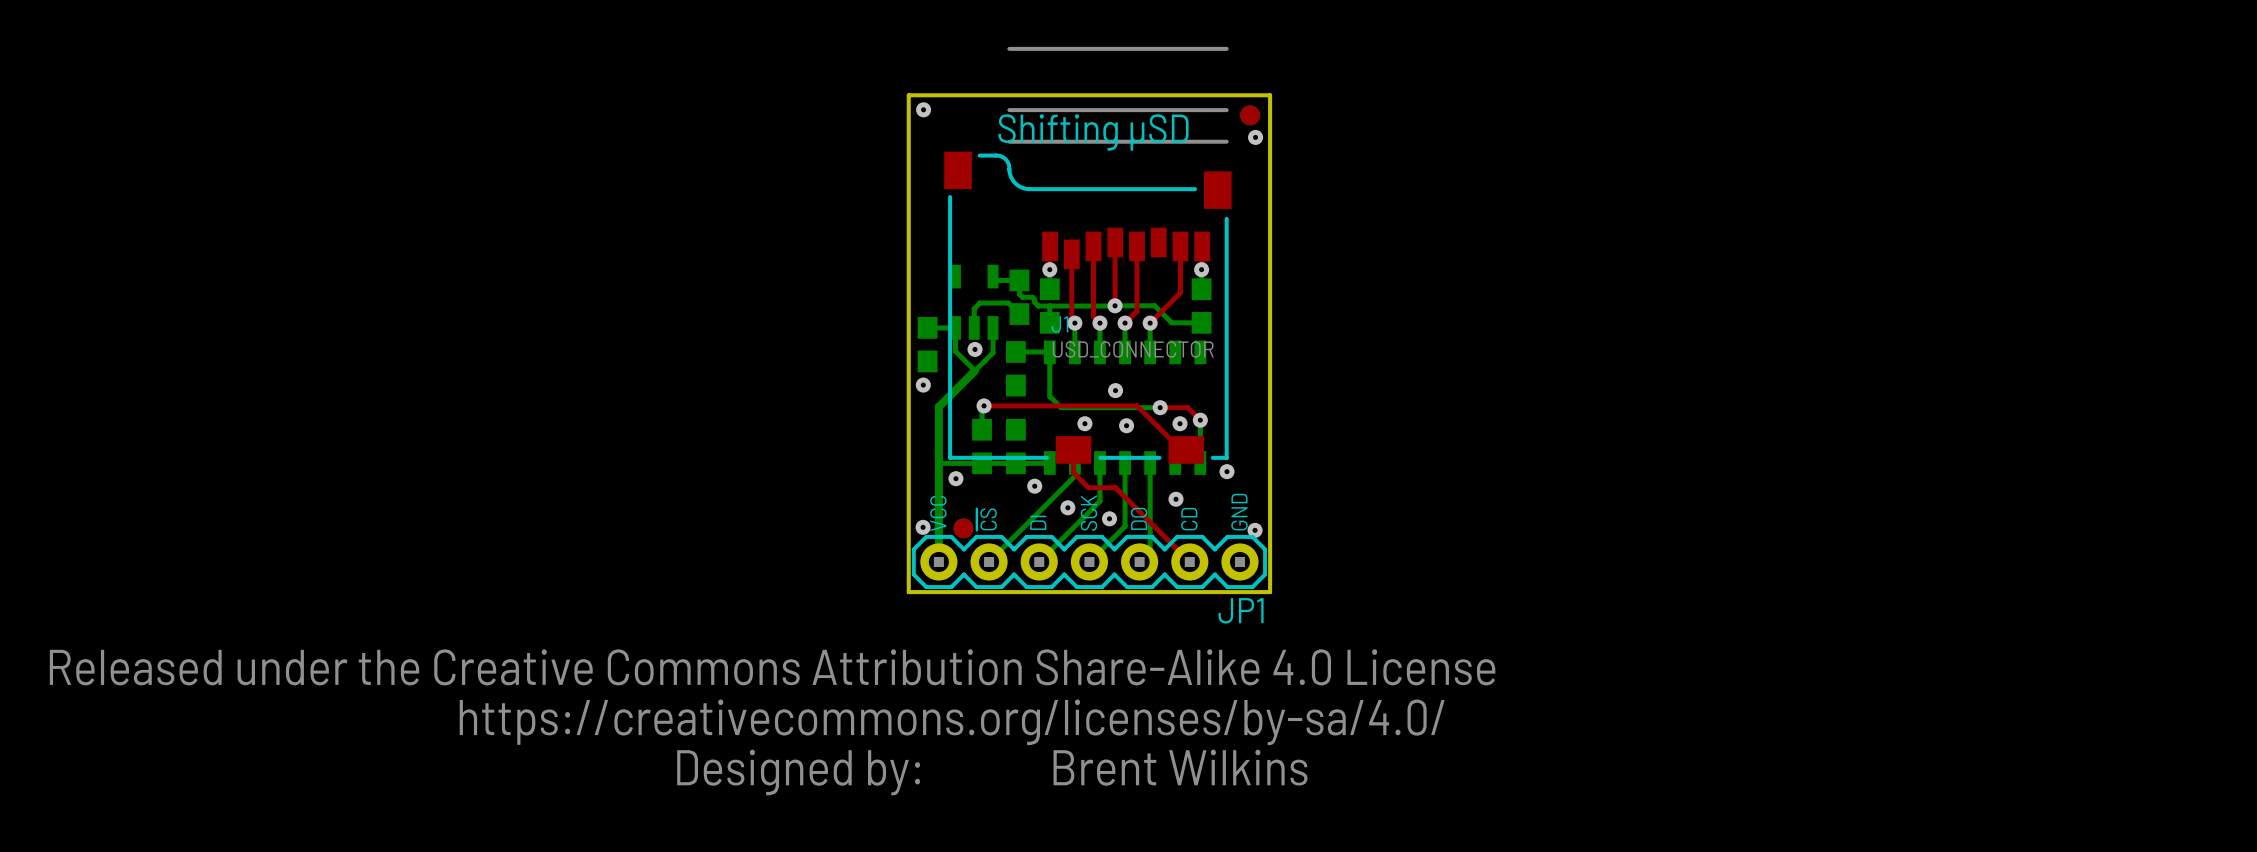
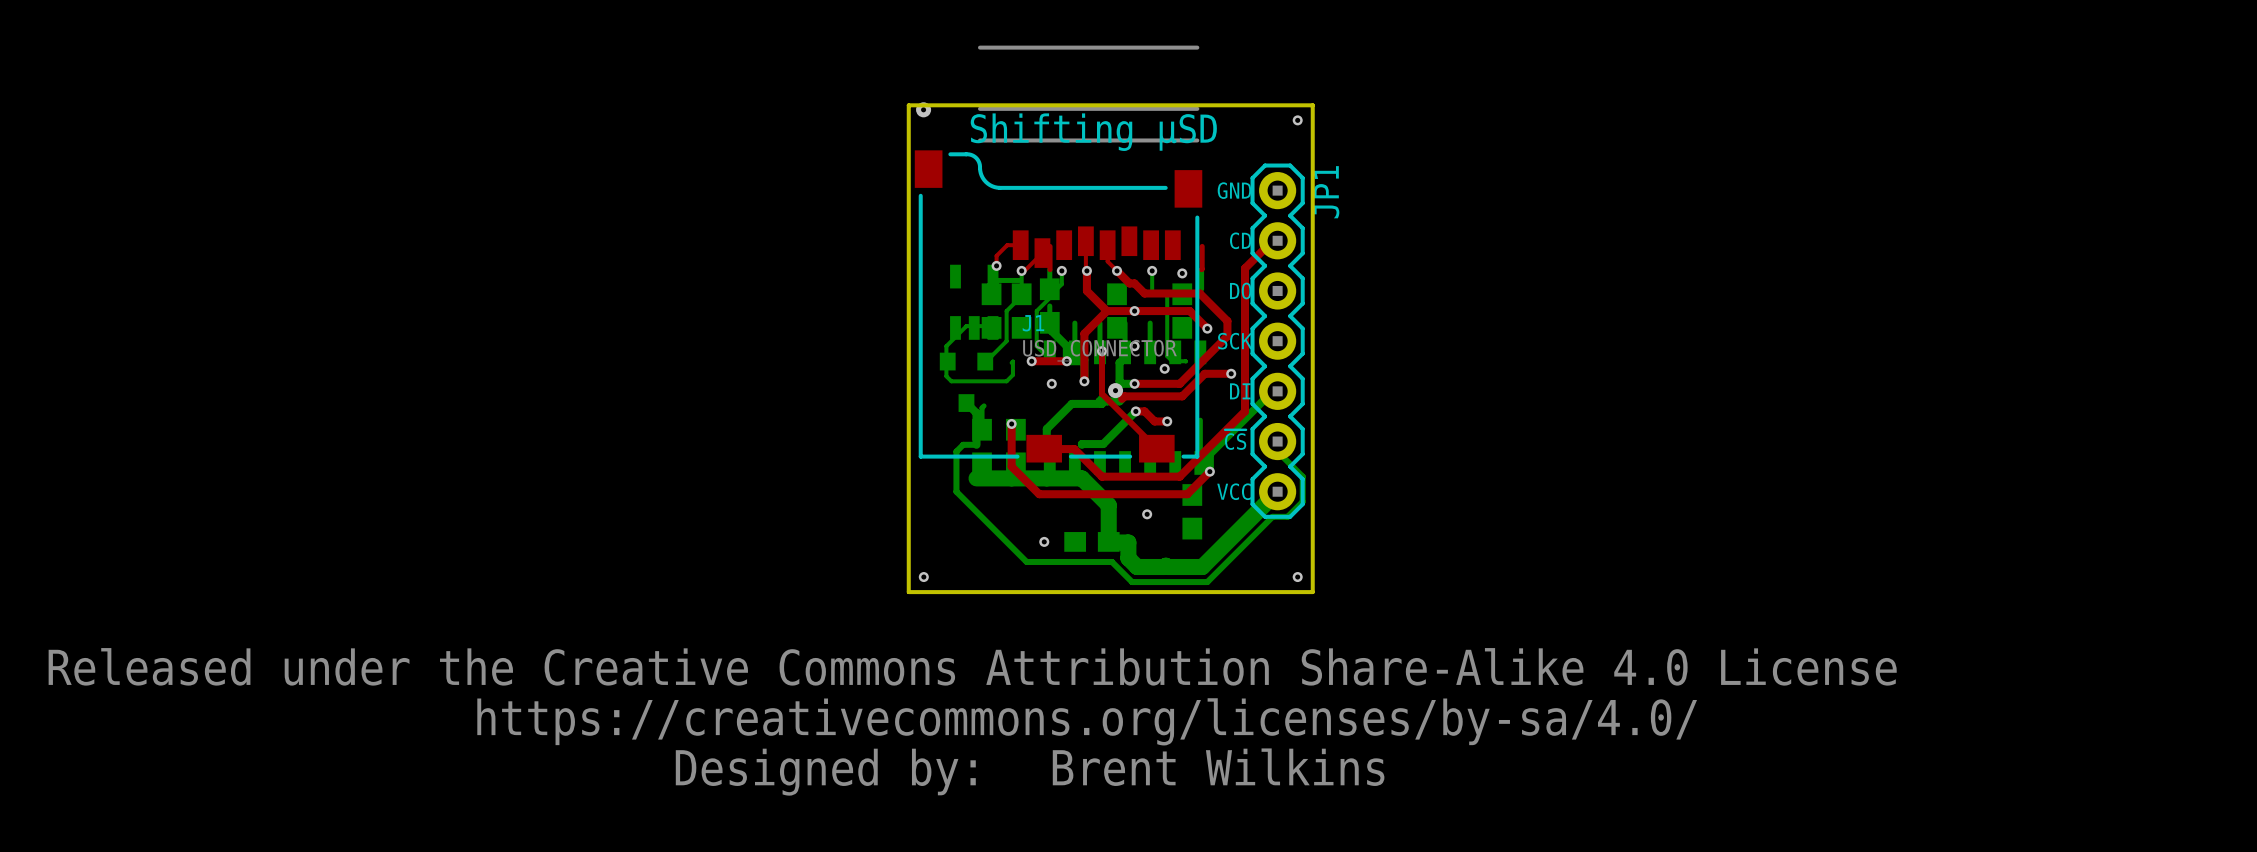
board edge: (908, 105) (908, 95) (1270, 95) (1270, 592) -> (908, 105) (1312, 105) (1312, 592) (1270, 592)
part: (1250, 115) -> none
via: none -> (1297, 120)
via: (1255, 137) -> none
top track: none -> (1277, 240) (1272, 240) (1245, 268) (1245, 411) (1179, 476) (1101, 476) (1074, 449) (1044, 449)
top track: none -> (1085, 241) (1086, 290) (1107, 311)
top track: (1115, 242) (1115, 305) -> none
top track: none -> (1020, 245) (1007, 245) (996, 255) (996, 265)
top track: none -> (1107, 245) (1107, 261) (1129, 283) (1134, 283) (1144, 293) (1199, 293) (1227, 321) (1227, 336) (1179, 383) (1134, 383)
top track: (1093, 246) (1093, 316) (1099, 323) -> none
top track: (1136, 246) (1136, 311) (1125, 323) -> none
top track: (1180, 246) (1180, 292) (1150, 323) -> none
top track: none -> (1042, 253) (1024, 270) (1021, 270)
top track: (1071, 254) (1071, 323) (1074, 323) -> none
J1 position: (1087, 255) -> (1058, 254)
via: none -> (996, 265)
via position: (1049, 269) -> (1061, 270)
via: (1201, 269) -> none
bottom track: none -> (1021, 270) (1021, 296) (1006, 311) (1006, 341) (991, 356) (986, 356) (981, 361) (985, 361)
via: none -> (1021, 270)
bottom track: none -> (1061, 270) (1061, 284) (1036, 311) (1036, 346) (1046, 356) (1046, 361) (1050, 361)
via: none -> (1086, 270)
via: none -> (1117, 270)
bottom track: none -> (1152, 270) (1152, 294) (1165, 294) (1167, 296) (1167, 356) (1172, 361) (1185, 361)
via: none -> (1152, 270)
via: none -> (1182, 273)
bottom track: (1019, 280) (1019, 294) (1022, 297) (1032, 297) (1038, 306) (1114, 306) -> none
part position: (1019, 297) -> (1021, 311)
bottom track: (1115, 305) (1154, 305) (1171, 322) (1201, 322) -> none
via: (1115, 305) -> none
part position: (1201, 306) -> (1182, 311)
part: none -> (991, 311)
top track: none -> (1107, 311) (1084, 333) (1084, 381)
top track: none -> (1107, 311) (1189, 311) (1207, 328)
part: none -> (1117, 311)
bottom track: (1019, 314) (1008, 303) (980, 303) (974, 308) (974, 327) -> none
via: (1074, 323) -> none
via: (1099, 323) -> none
via position: (1125, 323) -> (1134, 311)
via: (1150, 323) -> none
bottom track: (927, 327) (955, 327) (955, 351) (975, 370) -> none
bottom track: none -> (991, 327) (991, 326) (966, 326) (946, 346) (946, 376) (951, 381) (1006, 381) (1012, 374) (1012, 361) (1011, 362)
bottom track: (993, 327) (993, 352) (975, 370) -> none
bottom track: none -> (1051, 327) (1051, 331) (1066, 346) (1066, 361) (1082, 361)
via: none -> (1207, 328)
part: (927, 344) -> none
via: none -> (1134, 346)
via: (975, 349) -> none
bottom track: (1015, 351) (1049, 352) (1049, 396) (1061, 407) (1160, 407) -> none
top track: none -> (1101, 351) (1101, 393) (1156, 448)
via: none -> (1101, 351)
top track: none -> (1031, 361) (1066, 361)
via: none -> (1031, 361)
via: none -> (1066, 361)
bottom track: none -> (1120, 361) (1119, 381) (1122, 383) (1134, 383)
part: (1015, 368) -> none
via: none -> (1164, 368)
bottom track: (975, 370) (938, 406) (938, 561) -> none
top track: none -> (1231, 373) (1204, 373) (1182, 396) (1124, 396) (1122, 398)
via: none -> (1231, 373)
via: none -> (1084, 381)
part: none -> (966, 382)
via: none -> (1051, 383)
via: none -> (1134, 383)
via: (923, 385) -> none
bottom track: none -> (1277, 391) (1272, 391) (1209, 454) (1209, 471)
bottom track: none -> (1122, 398) (1119, 401) (1107, 401) (1101, 398) (1099, 401) (1101, 403) (1071, 403) (1046, 428) (1046, 444)
bottom track: none -> (966, 403) (976, 413) (976, 444) (963, 444) (956, 451) (956, 491) (1026, 561) (1112, 561) (1132, 582) (1207, 582) (1272, 516) (1287, 516) (1302, 501) (1302, 476) (1277, 451) (1277, 441)
top track: (984, 405) (1137, 405) (1173, 442) (1178, 442) (1186, 449) -> none
via: (984, 405) -> none
top track: (1160, 407) (1187, 407) (1200, 420) -> none
via: (1160, 407) -> none
top track: none -> (1135, 411) (1144, 411) (1154, 421) (1167, 421)
bottom track: none -> (1135, 411) (1103, 444) (1081, 444)
via: none -> (1135, 411)
via: (1200, 420) -> none
via: none -> (1167, 421)
top track: none -> (1011, 423) (1011, 466) (1039, 494) (1187, 494) (1209, 471)
via: none -> (1011, 423)
via: (1084, 423) -> none
via: (1180, 423) -> none
via: (1126, 425) -> none
top track: (1073, 449) (1073, 472) (1088, 487) (1115, 487) (1189, 561) -> none
bottom track: (938, 461) (941, 463) (1049, 462) -> none
bottom track: (1074, 462) (1074, 476) (989, 561) -> none
bottom track: (1099, 462) (1099, 501) (1039, 561) -> none
bottom track: (1125, 462) (1125, 526) (1089, 561) -> none
bottom track: (1150, 462) (1150, 551) (1139, 561) -> none
via: none -> (1209, 471)
via: (1226, 471) -> none
via: (955, 478) -> none
bottom track: none -> (976, 478) (1081, 478) (1108, 505) (1108, 541) (1128, 542) (1128, 558) (1137, 567) (1202, 567) (1277, 491)
via: (1034, 486) -> none
via: (1176, 499) -> none
via: (1067, 507) -> none
part: none -> (1192, 511)
text rotation: 0° (1239, 512) -> 90° clockwise (1234, 190)
text position: GND (1239, 512) -> GND (1234, 190)
text rotation: 0° (938, 513) -> 90° clockwise (1234, 491)
text position: VCC (938, 513) -> VCC (1234, 491)
text rotation: 0° (1088, 513) -> 90° clockwise (1235, 341)
text position: SCK (1088, 513) -> SCK (1235, 341)
via: none -> (1147, 514)
via: (1109, 518) -> none
text rotation: 0° (1139, 518) -> 90° clockwise (1240, 290)
text position: DO (1139, 518) -> DO (1240, 290)
text rotation: 0° (986, 519) -> 90° clockwise (1235, 439)
text position: ~{CS} (986, 519) -> ~{CS} (1235, 439)
text rotation: 0° (1189, 519) -> 90° clockwise (1240, 240)
text position: CD (1189, 519) -> CD (1240, 240)
text rotation: 0° (1038, 522) -> 90° clockwise (1240, 391)
text position: DI (1038, 522) -> DI (1240, 391)
via: (923, 527) -> none
part: (963, 528) -> none
via: (1255, 530) -> none
via: none -> (1044, 541)
part: none -> (1091, 541)
JP1 rotation: 0° (1089, 561) -> 90° clockwise (1277, 341)
JP1 position: (1089, 561) -> (1277, 341)
via: none -> (923, 577)
via: none -> (1297, 577)
JP1 name position: JP1 (1241, 610) -> JP1 (1326, 192)

